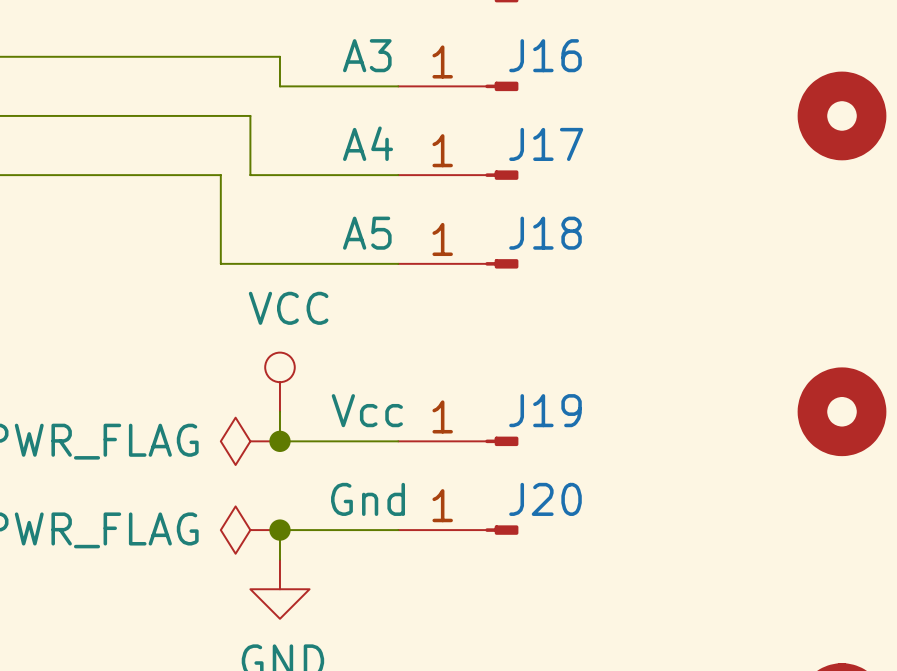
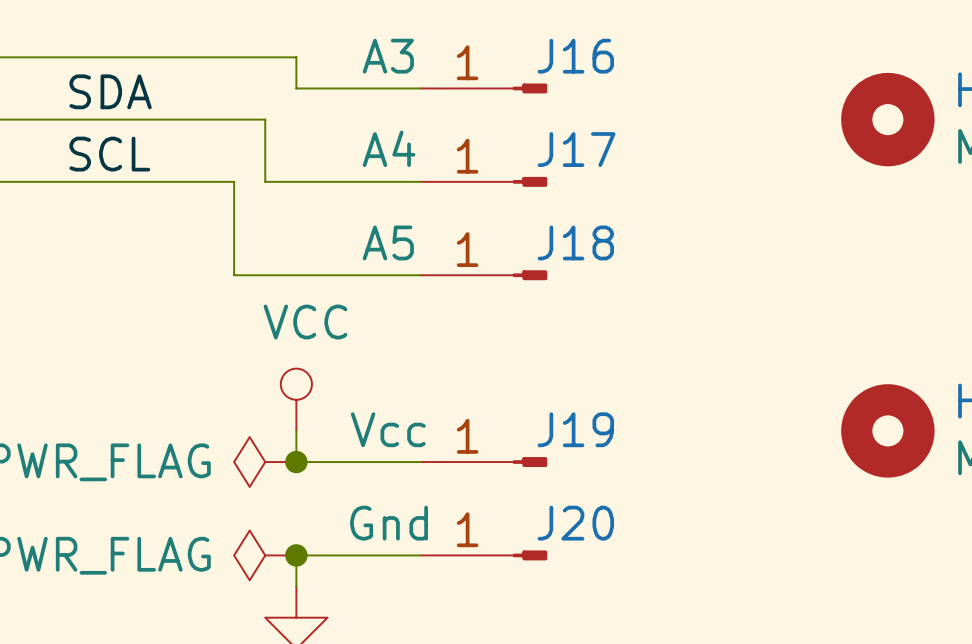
label: none -> SDA (110, 91)
label: none -> SCL (109, 154)

